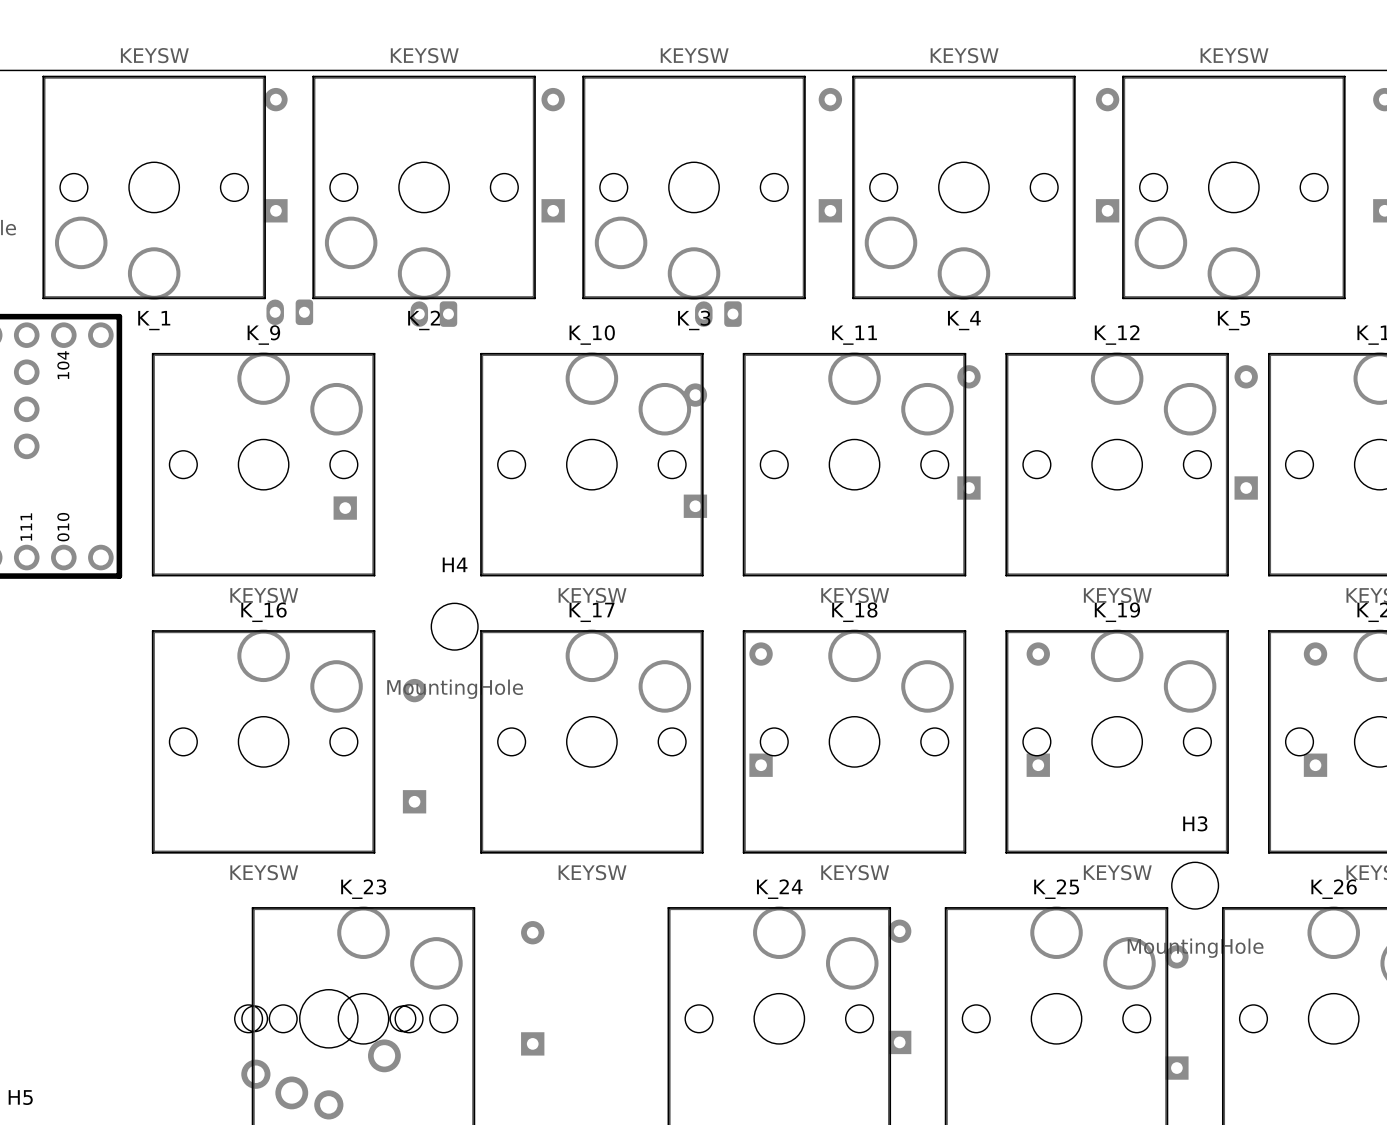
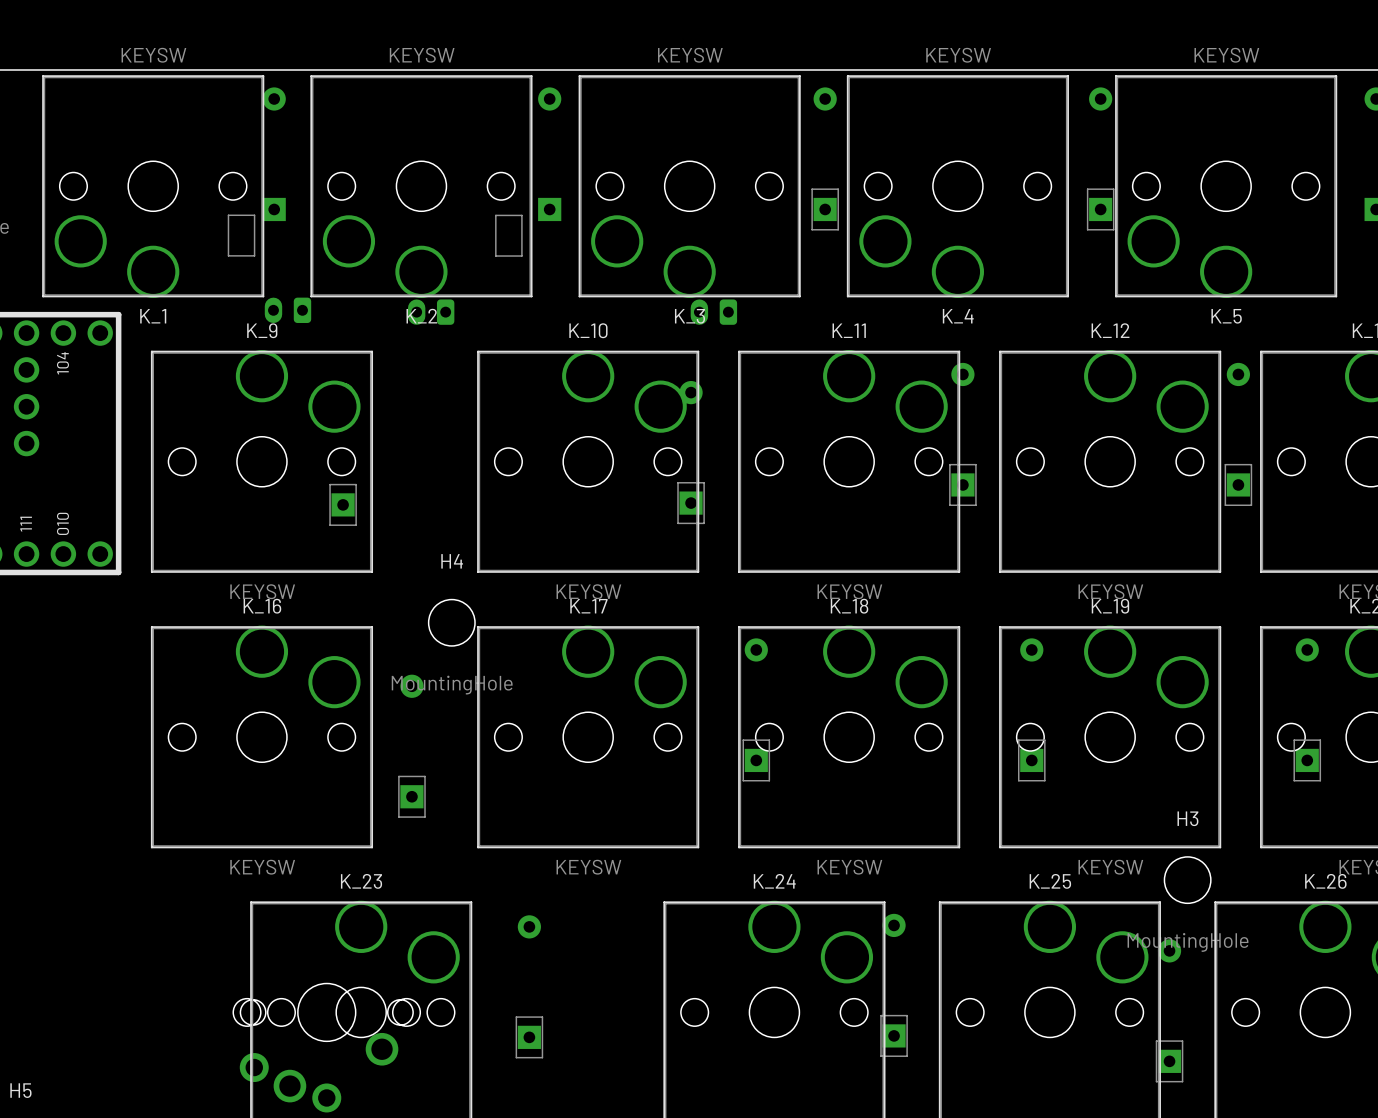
part: none -> (825, 209)
part: none -> (1100, 209)
part: none -> (241, 235)
part: none -> (508, 235)
part: none -> (962, 484)
part: none -> (1238, 484)
part: none -> (691, 503)
part: none -> (343, 504)
part: none -> (756, 760)
part: none -> (1031, 760)
part: none -> (1307, 760)
part: none -> (411, 796)
part: none -> (894, 1035)
part: none -> (529, 1037)
part: none -> (1169, 1061)

